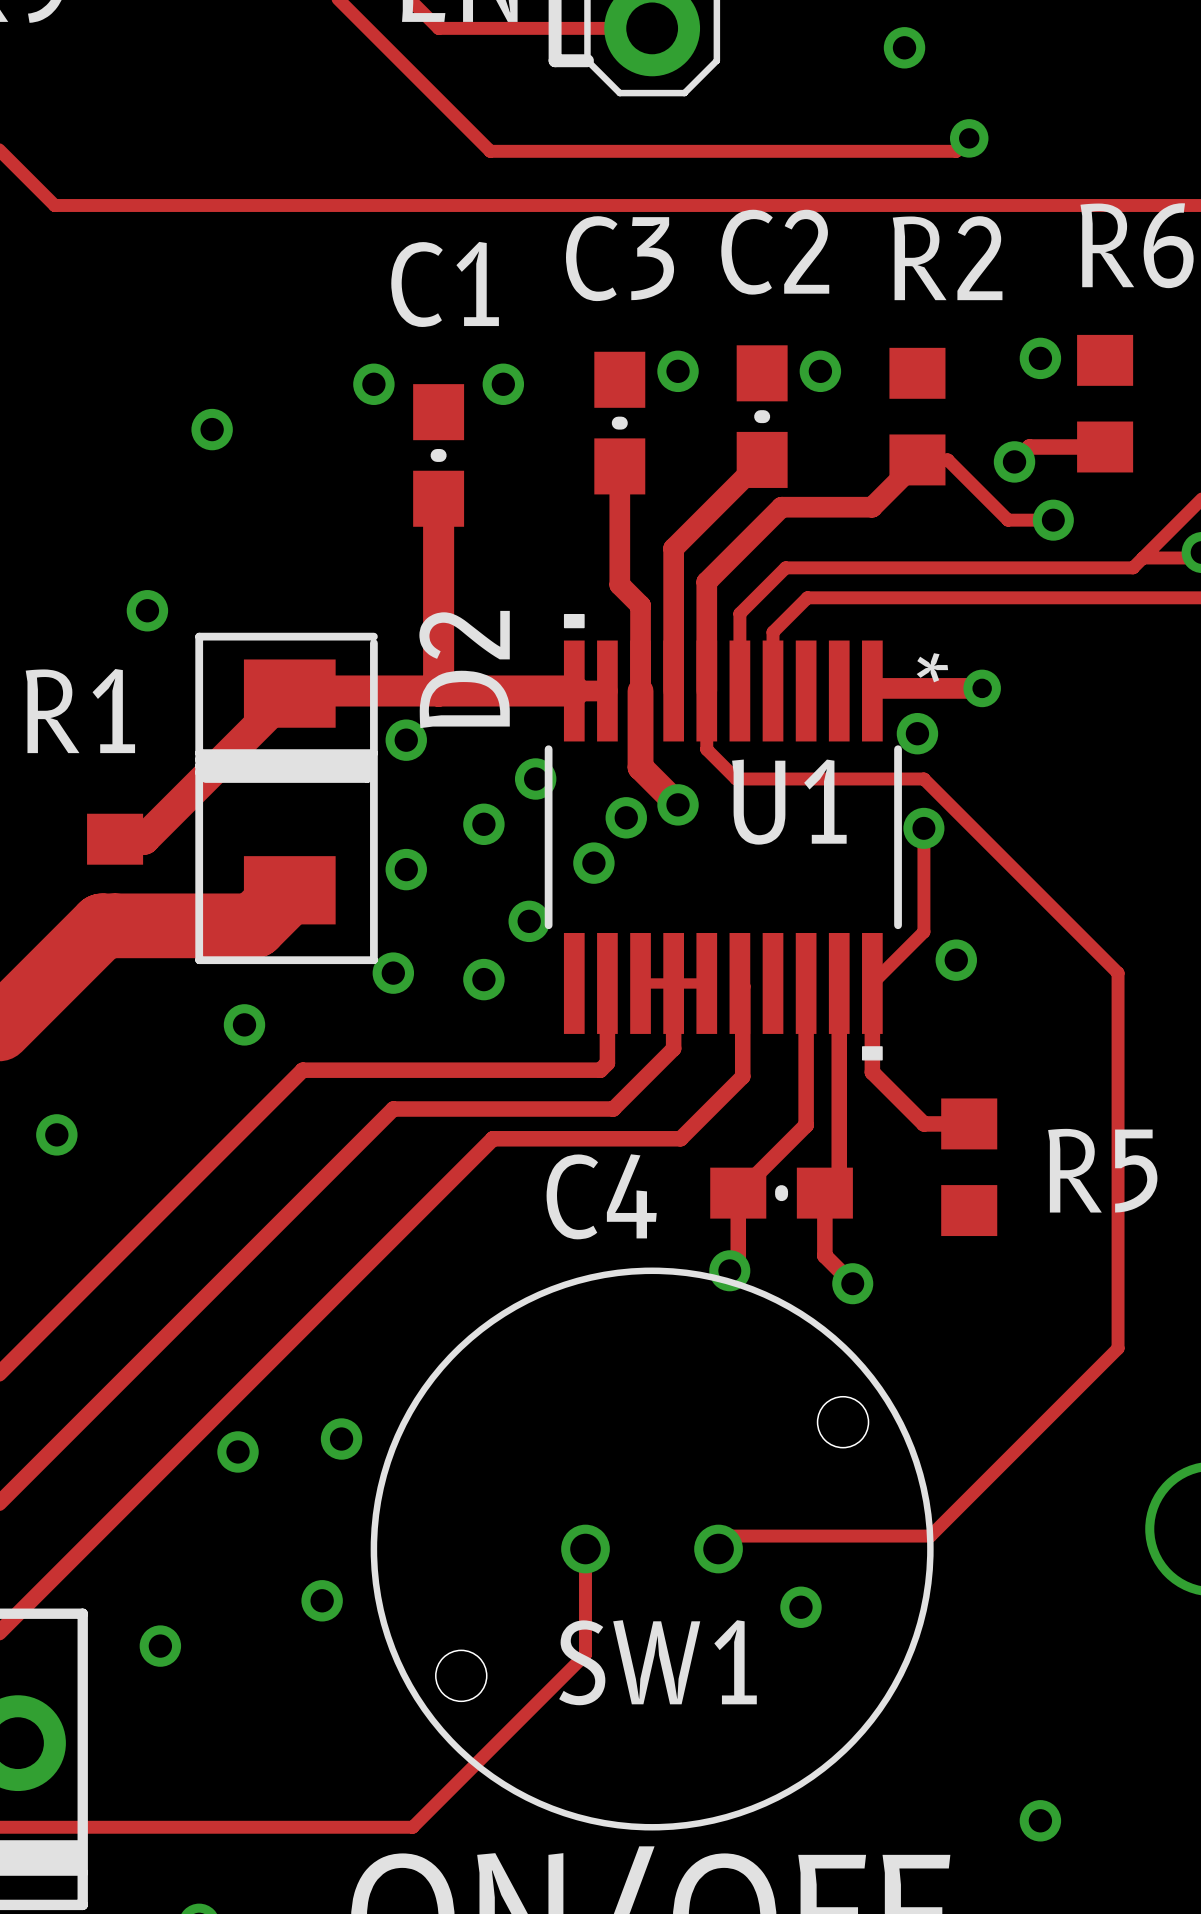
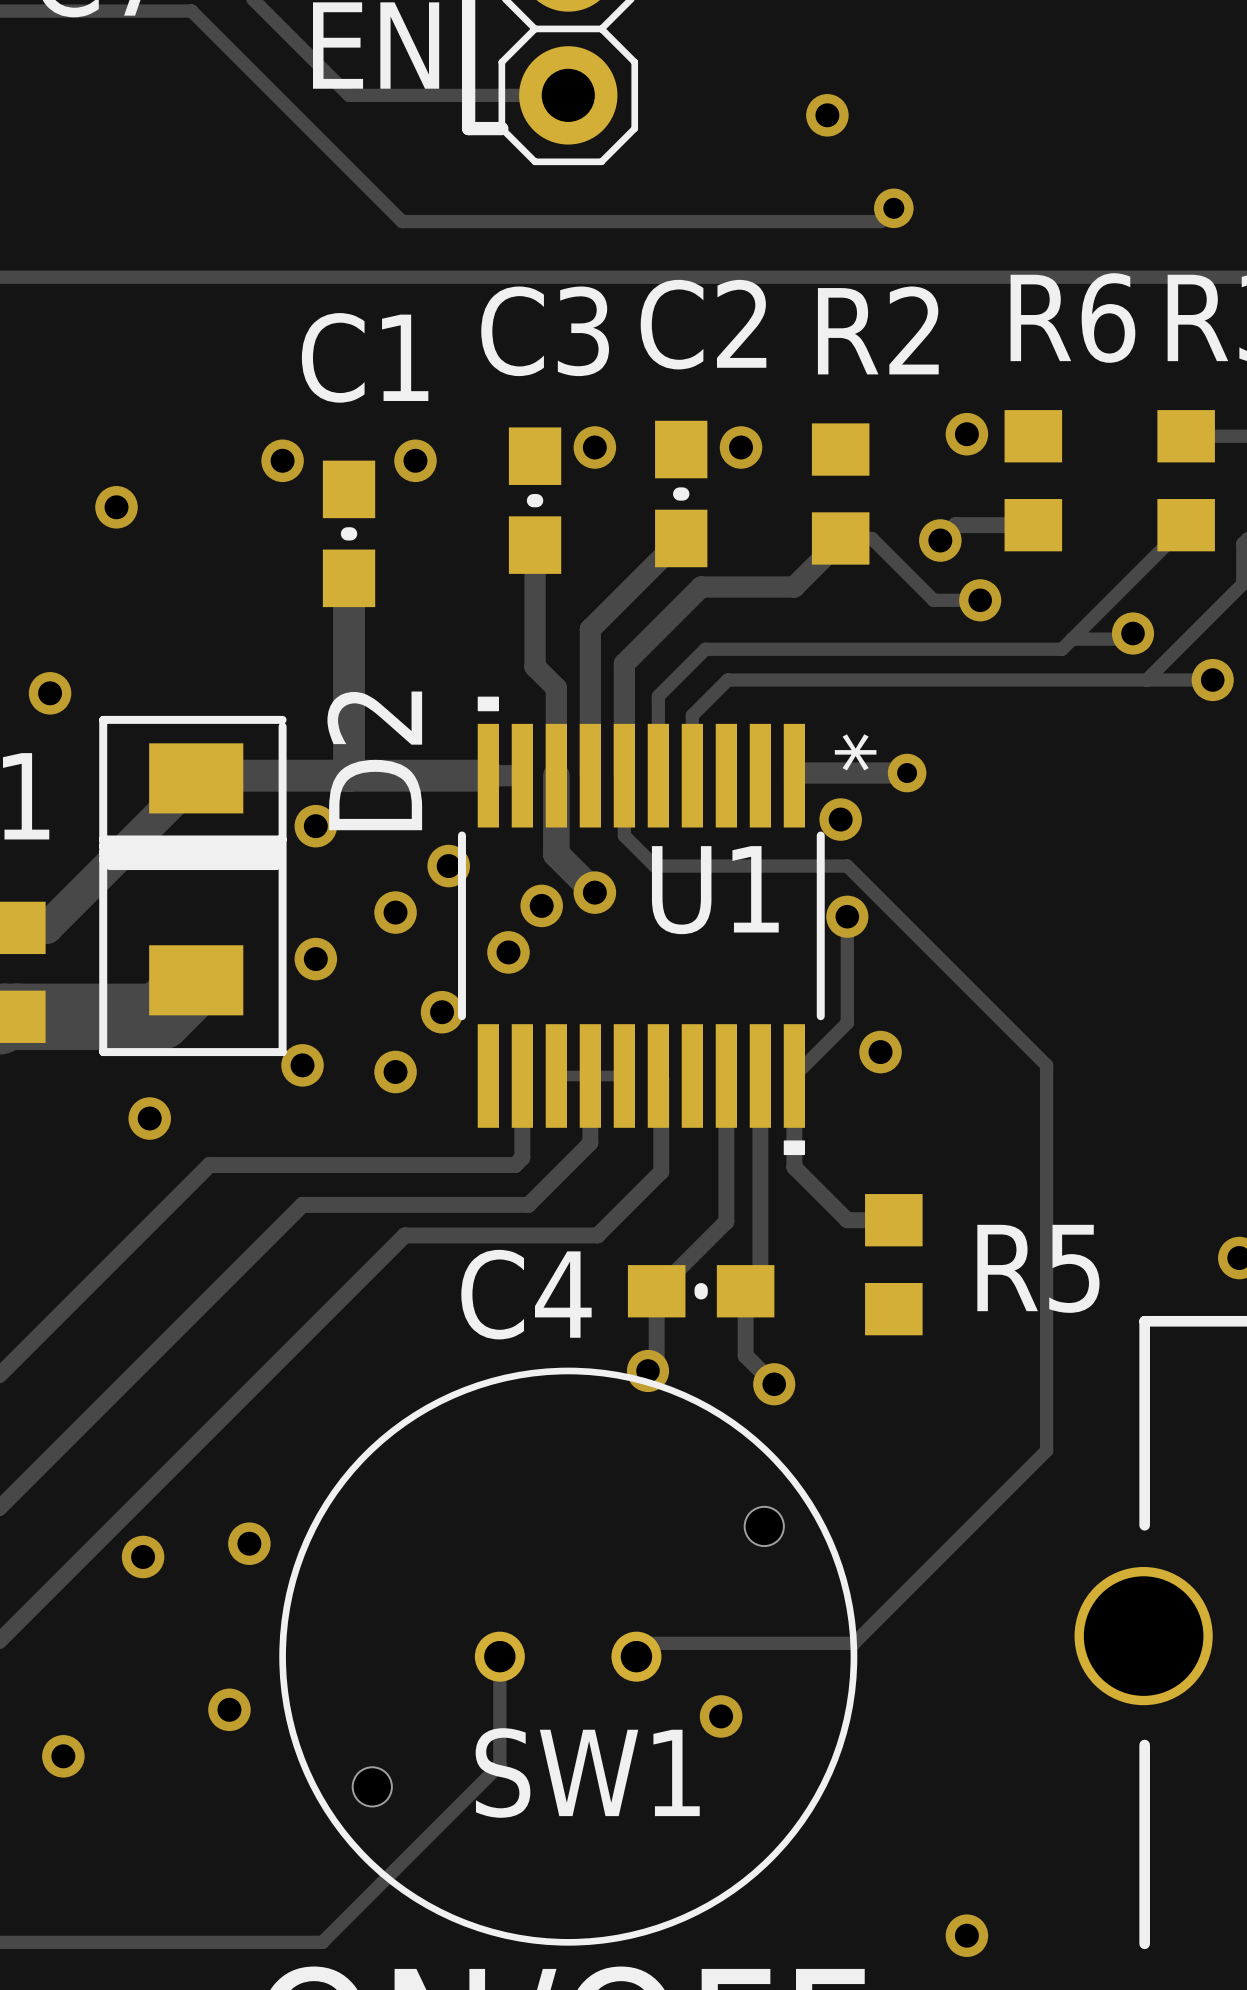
SW1 footprint: [370, 1267, 934, 1831] -> [279, 1367, 858, 1946]

